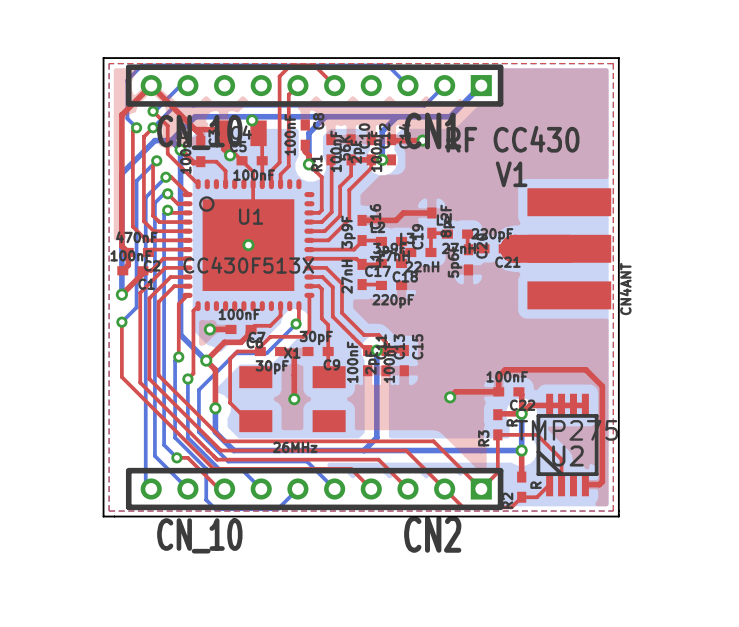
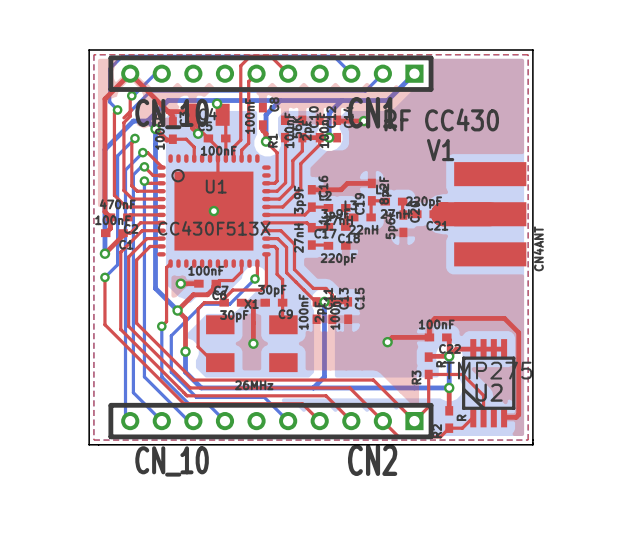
top track: (153, 111) (167, 125) (167, 153) (198, 184) -> none
via: (153, 127) -> none
top track: (143, 136) (143, 142) -> (130, 97) (130, 116) (123, 122)
bottom track: (167, 210) (164, 213) (164, 445) (176, 457) -> (144, 181) (144, 376) (188, 421) (193, 421)
top track: (187, 295) (178, 304) (178, 357) -> none
bottom track: (178, 357) (175, 360) (175, 437) (206, 468) (206, 499) (215, 509) (277, 509) (297, 489) -> none
via: (178, 357) -> none
top track: (176, 457) (187, 457) (219, 489) (224, 489) -> none
via: (176, 457) -> none

